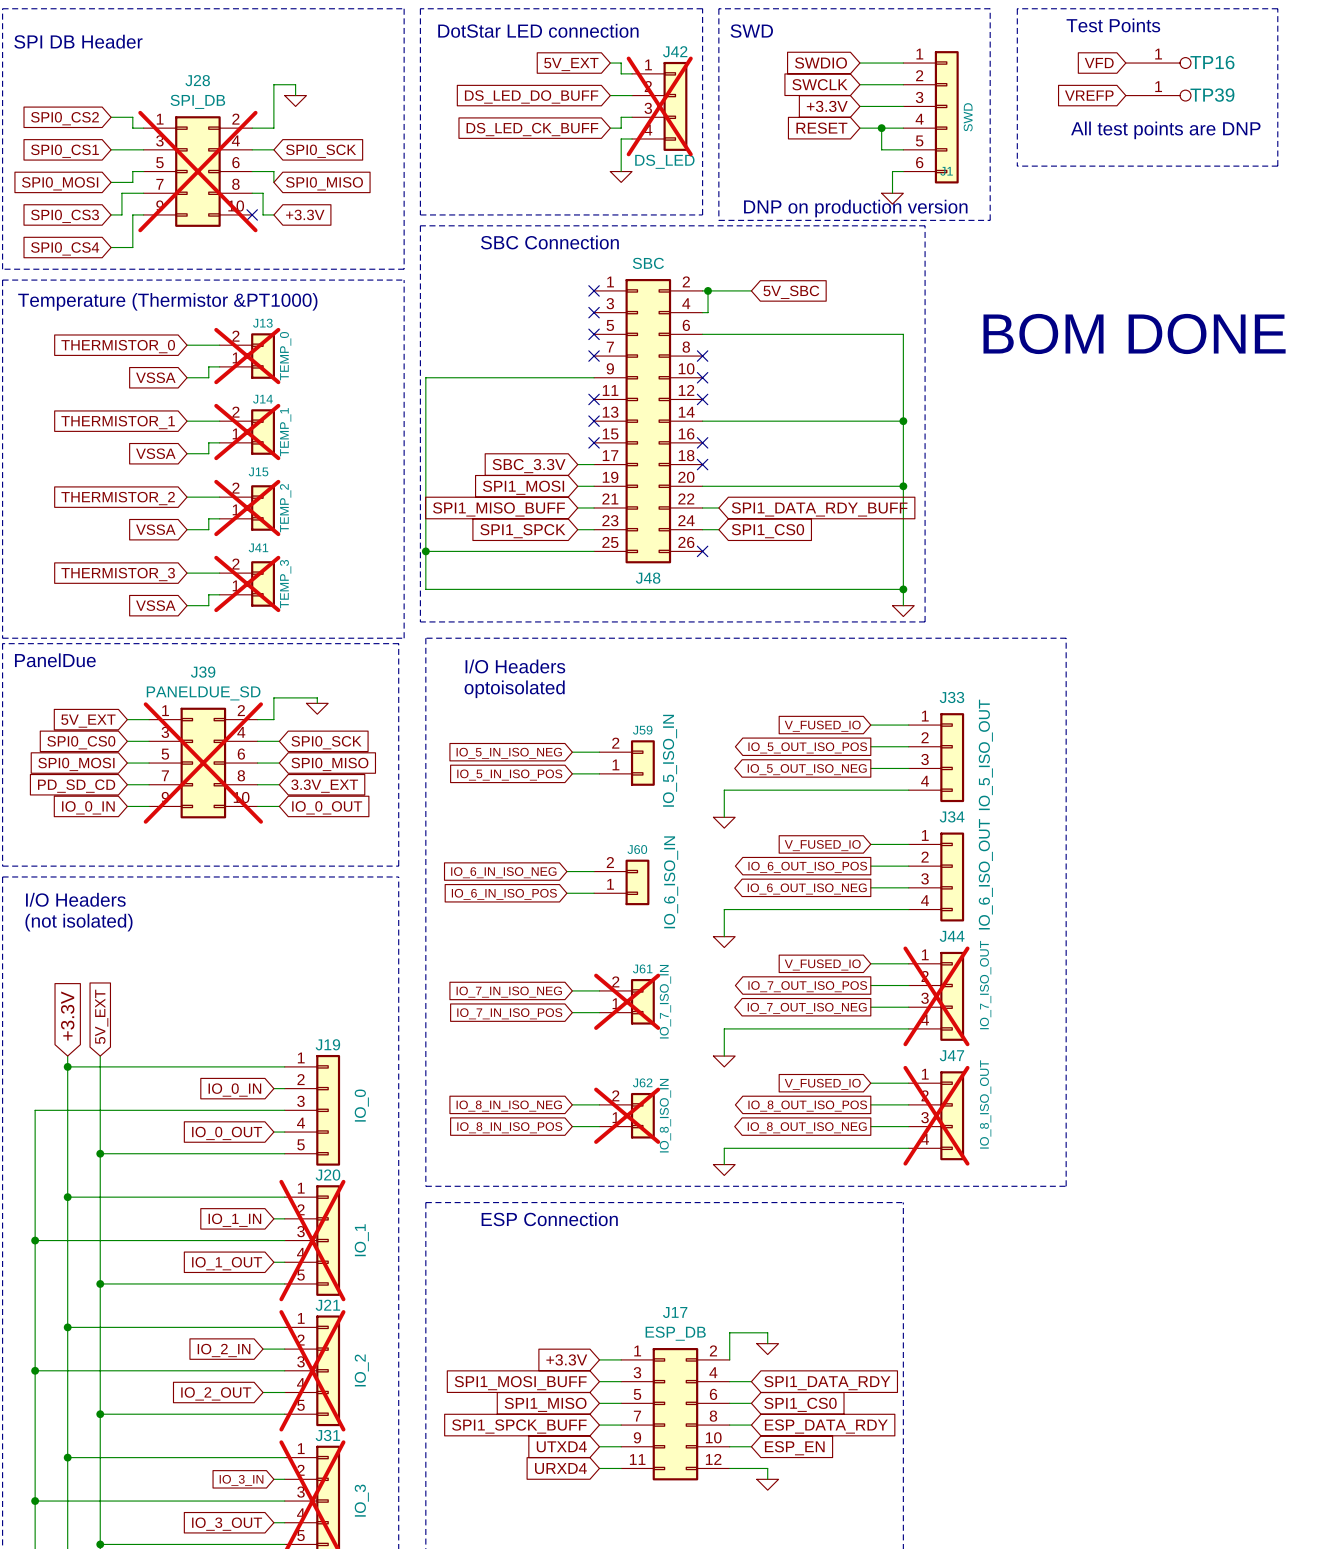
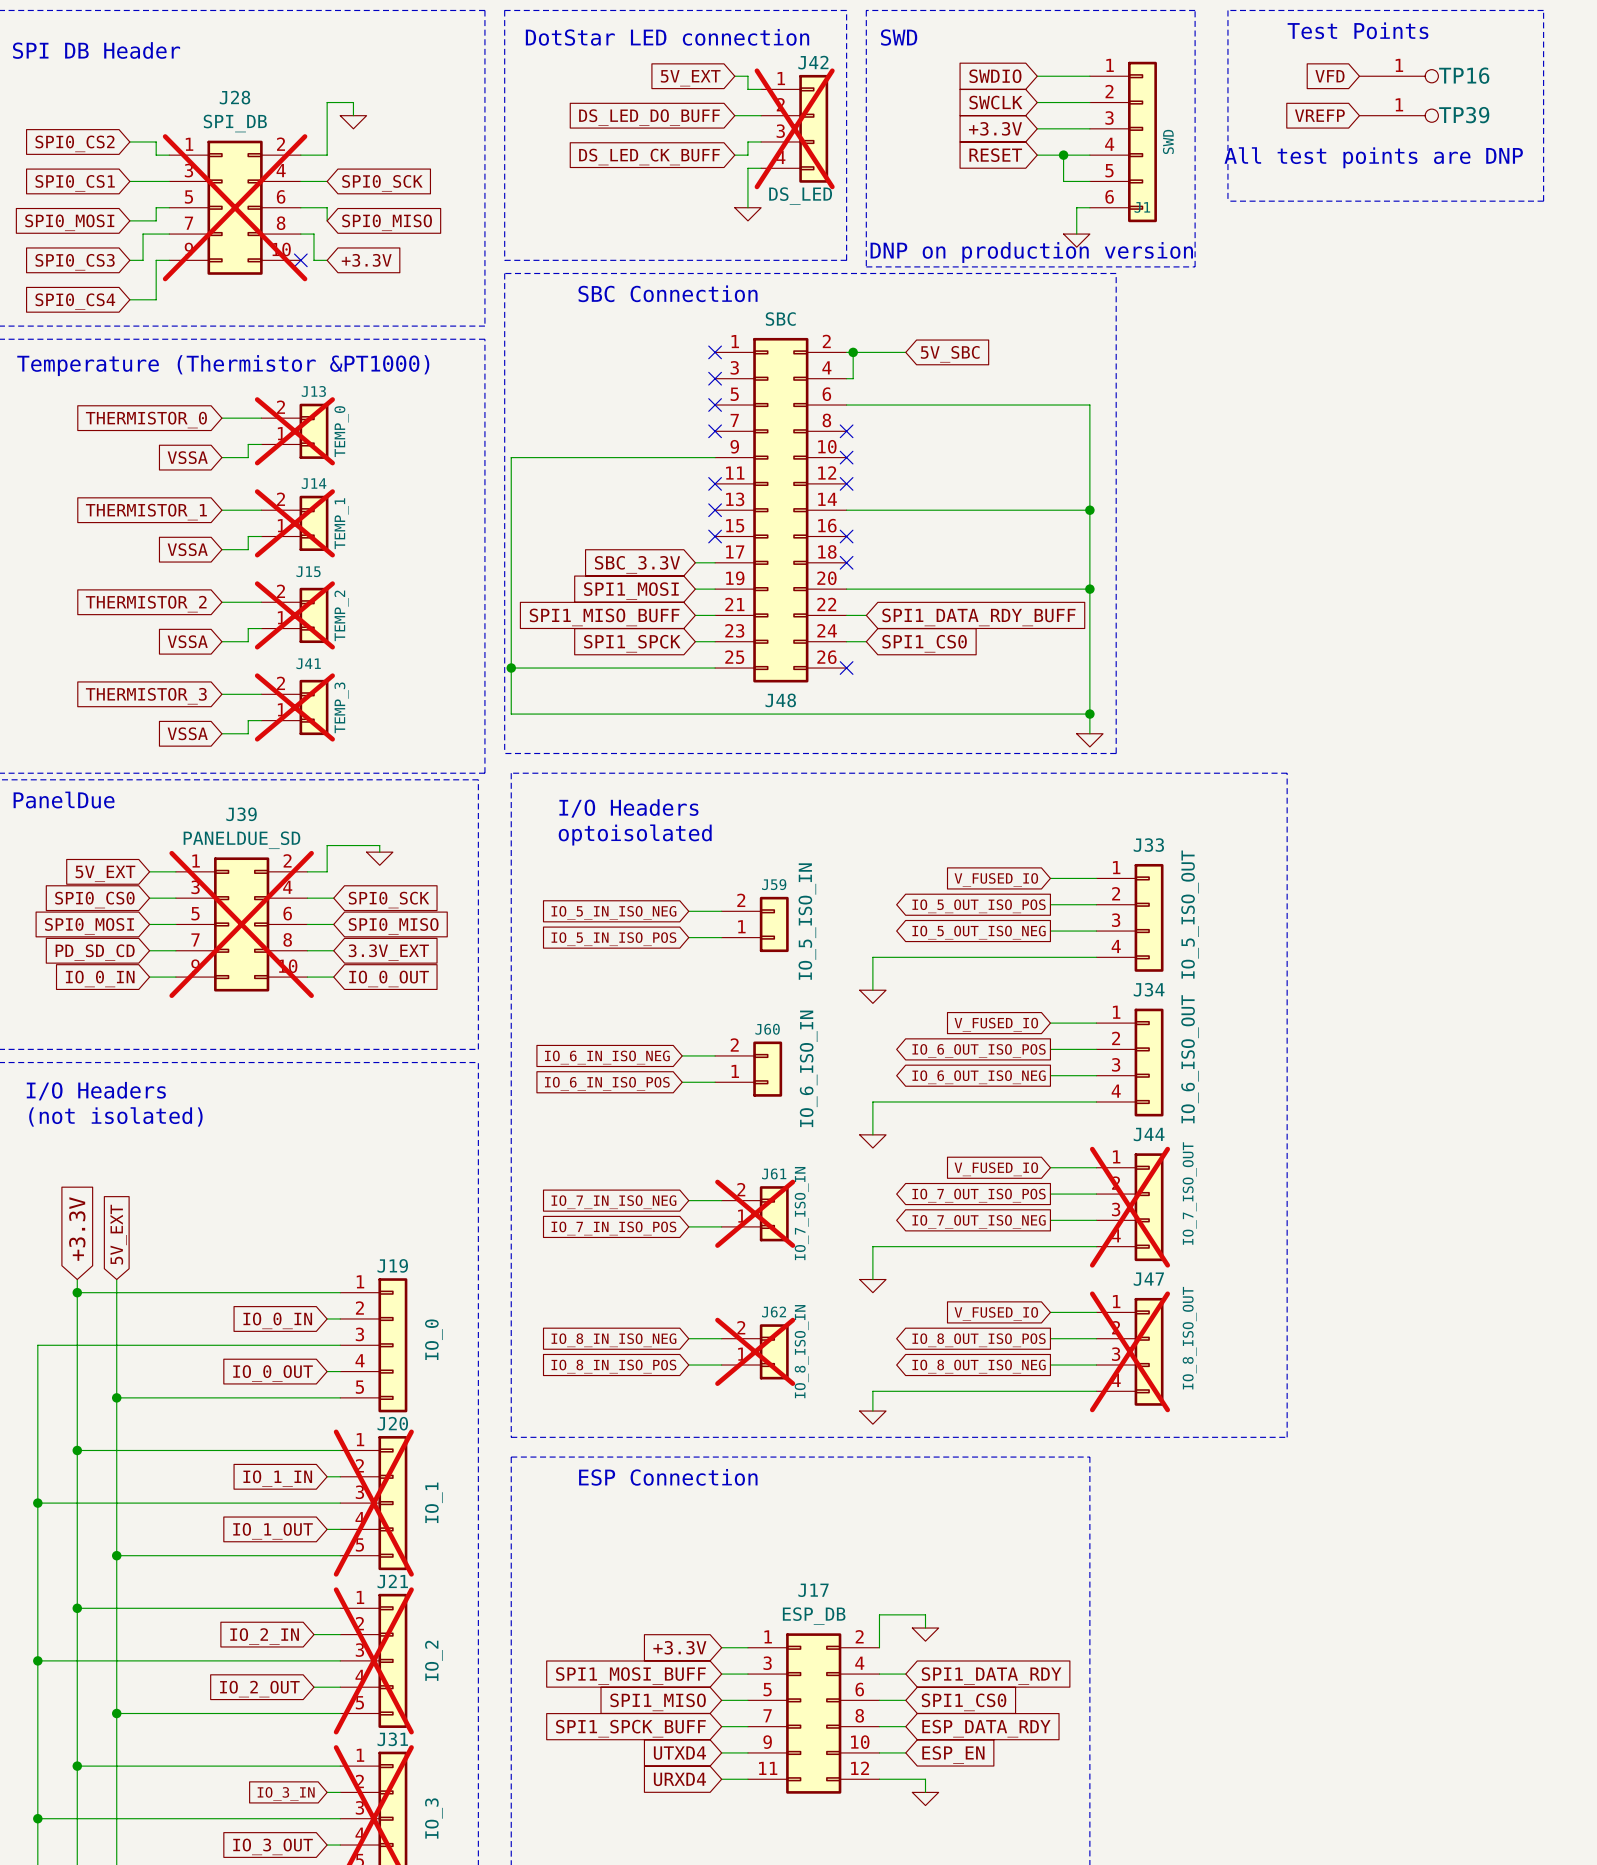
text: BOM DONE (1134, 333) -> none

